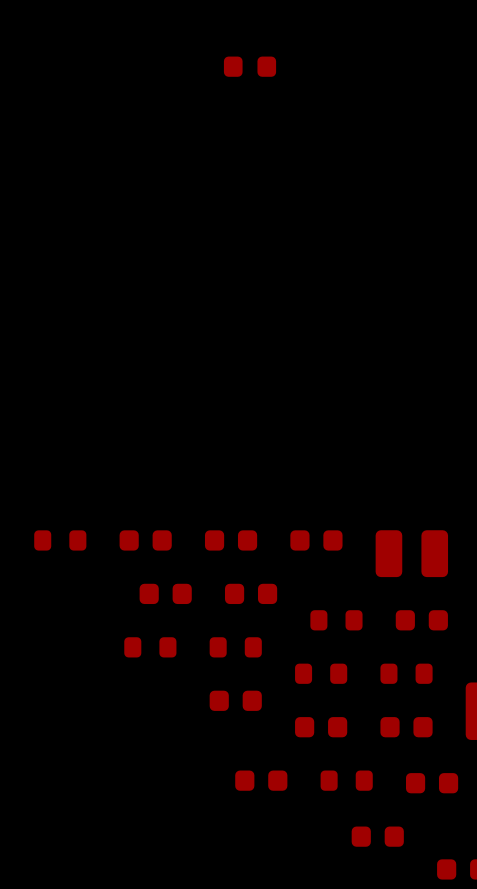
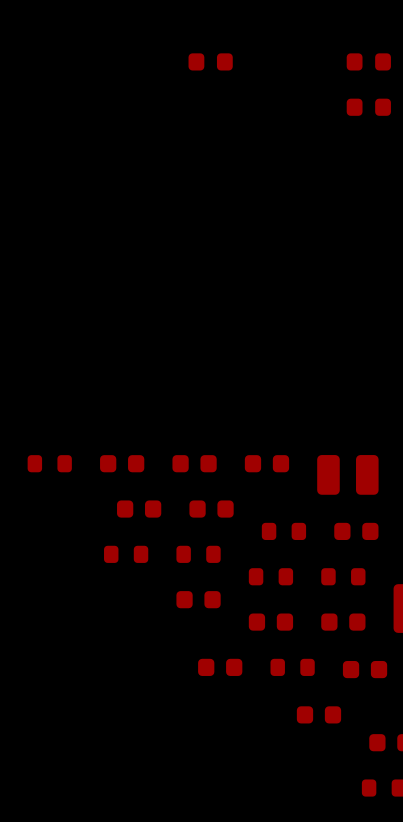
part: none -> (368, 61)
part: none -> (368, 107)

